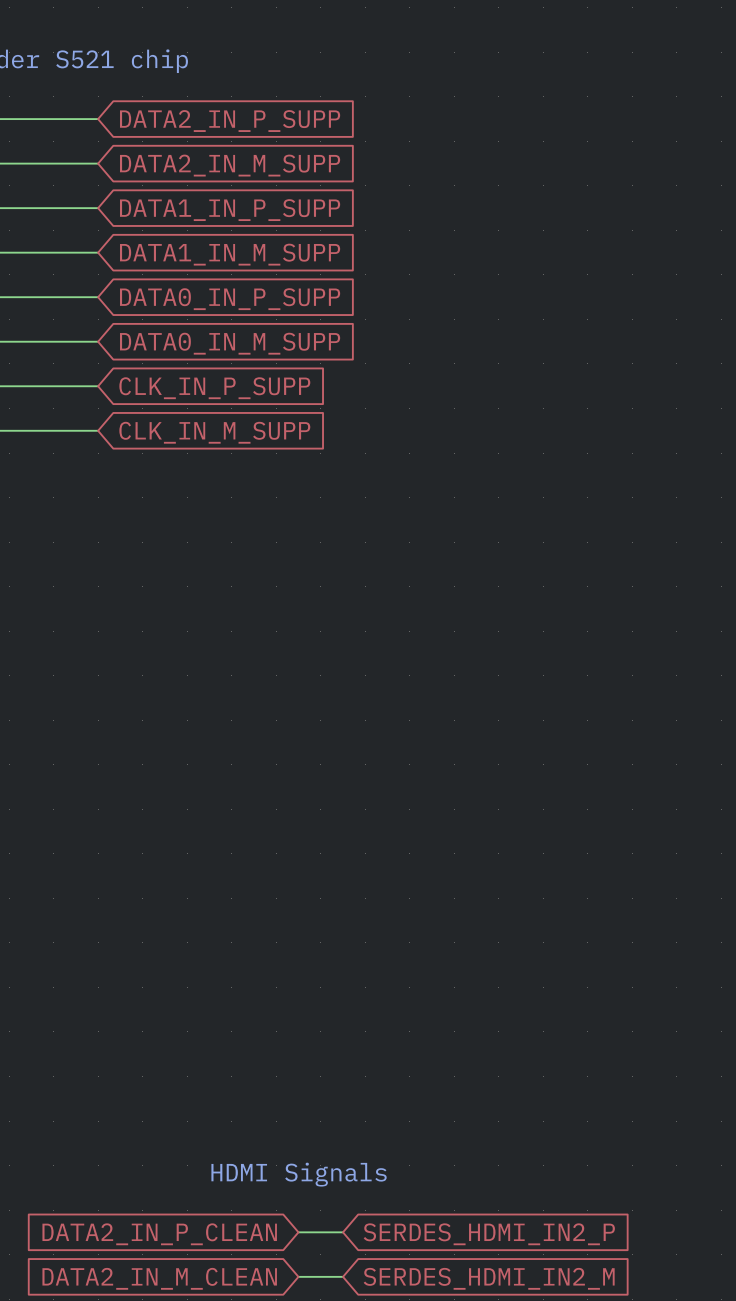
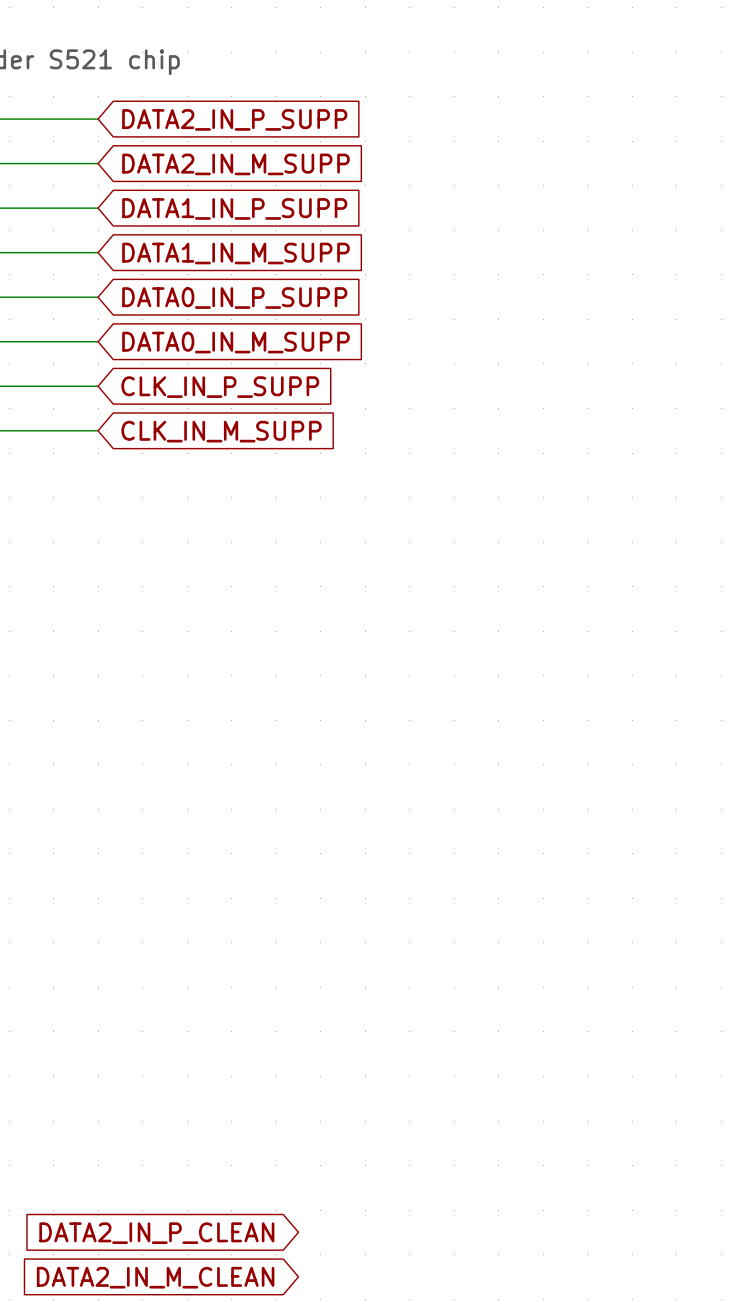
text: HDMI Signals (299, 1174) -> none
wire: (298, 1232) (343, 1232) -> none
global label: SERDES_HDMI_IN2_P (489, 1234) -> none
wire: (298, 1276) (343, 1276) -> none
global label: SERDES_HDMI_IN2_M (489, 1278) -> none

